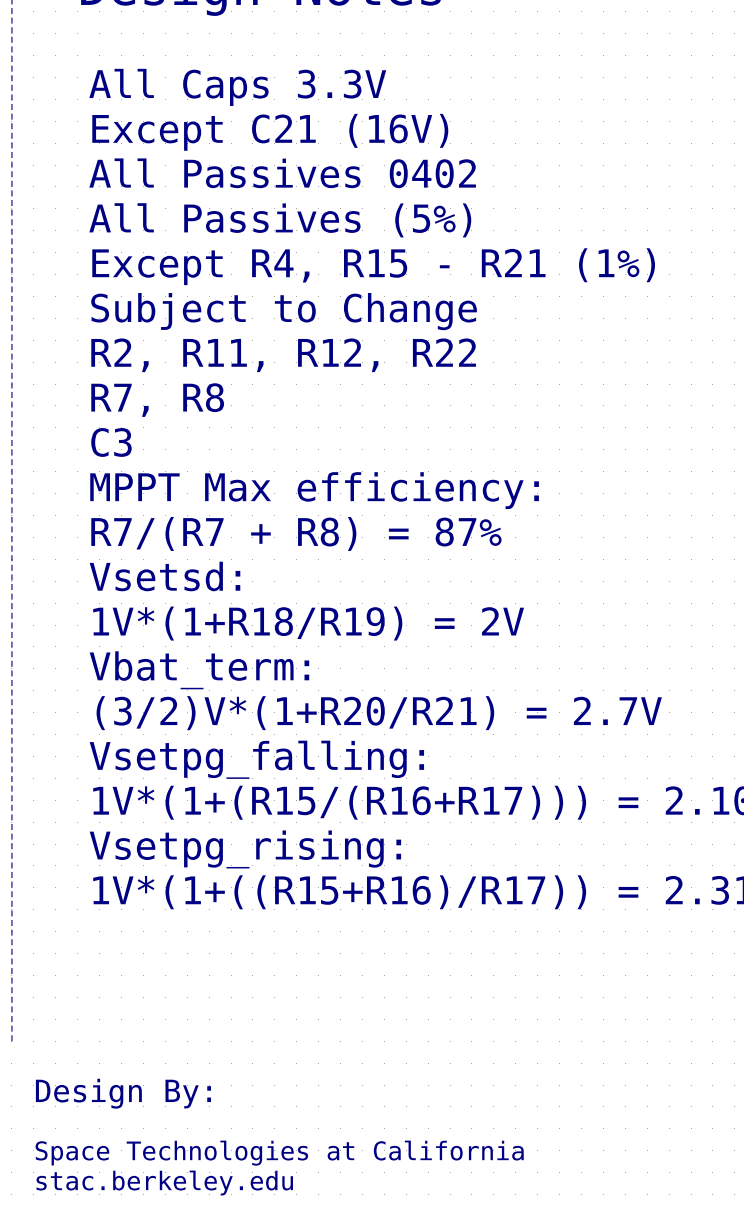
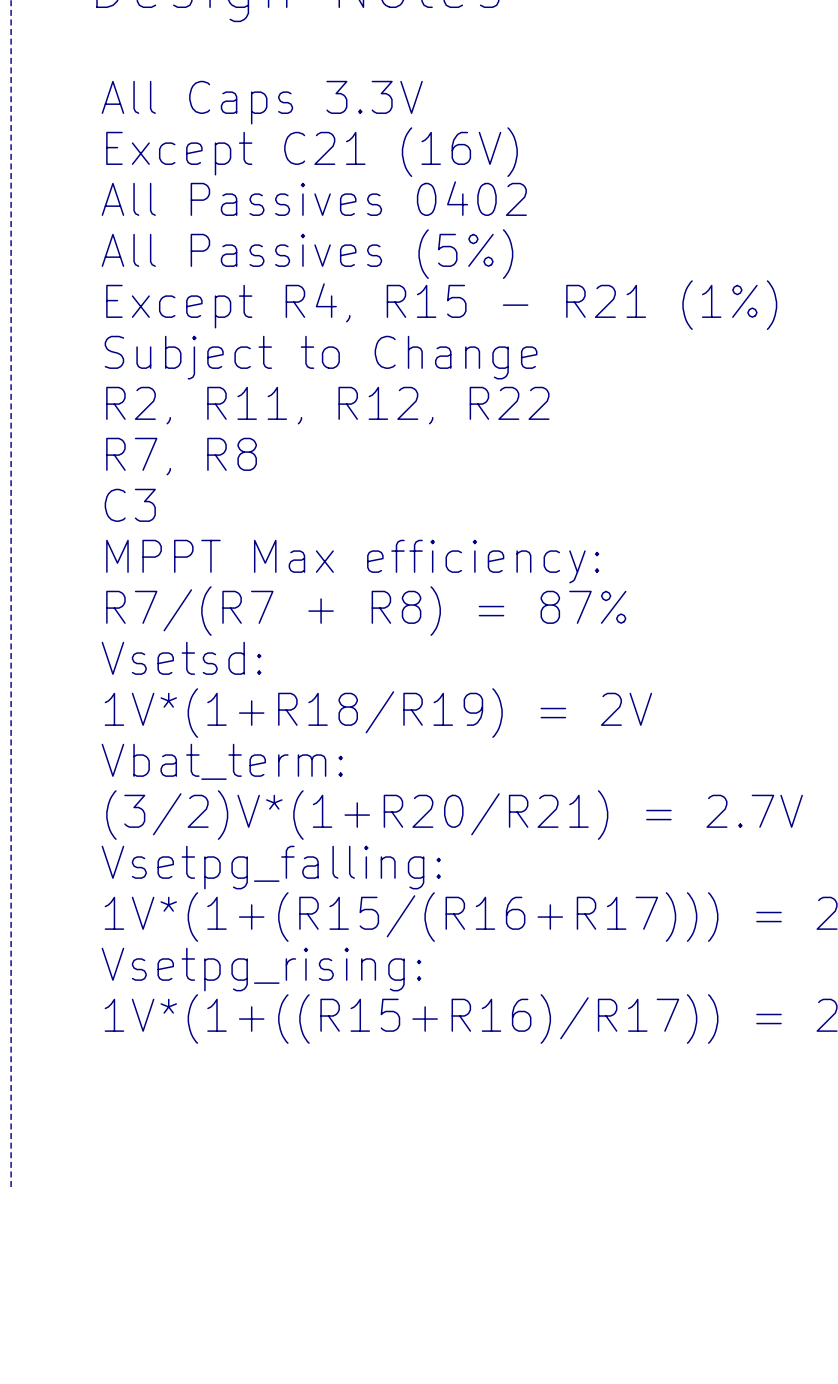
text: Design By: (123, 1093) -> none
text: Space Technologies at California (279, 1153) -> none
text: stac.berkeley.edu (164, 1183) -> none

